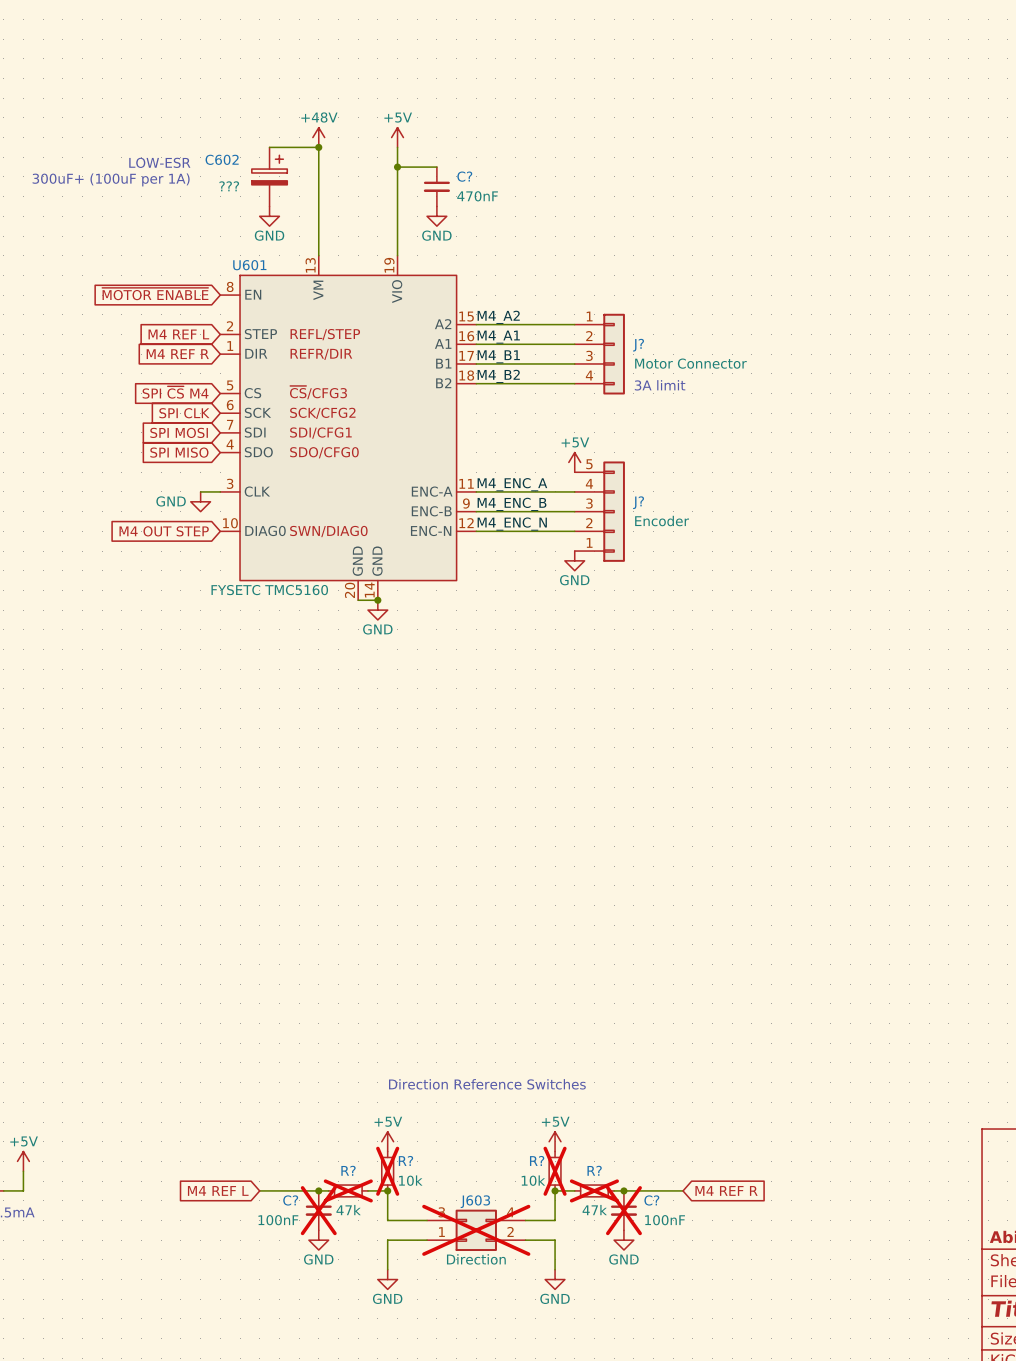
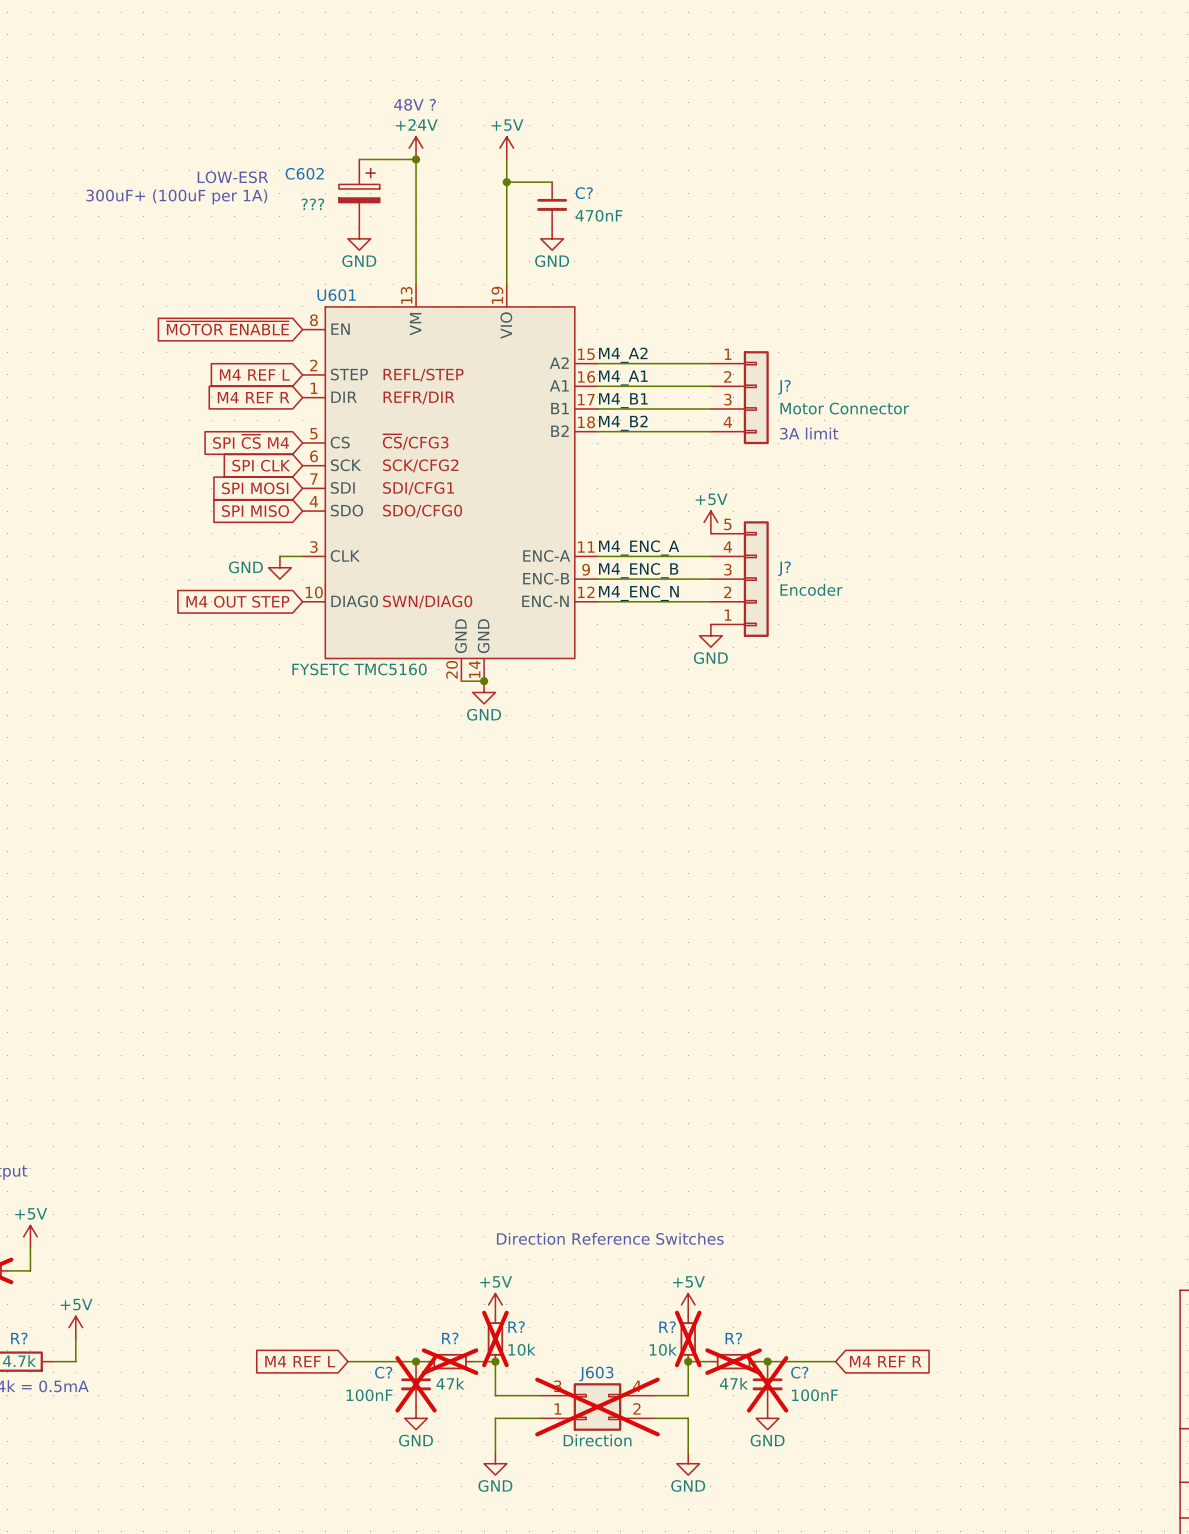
text: none -> 48V ? (415, 104)
power symbol: +48V (318, 137) -> +24V (416, 148)

